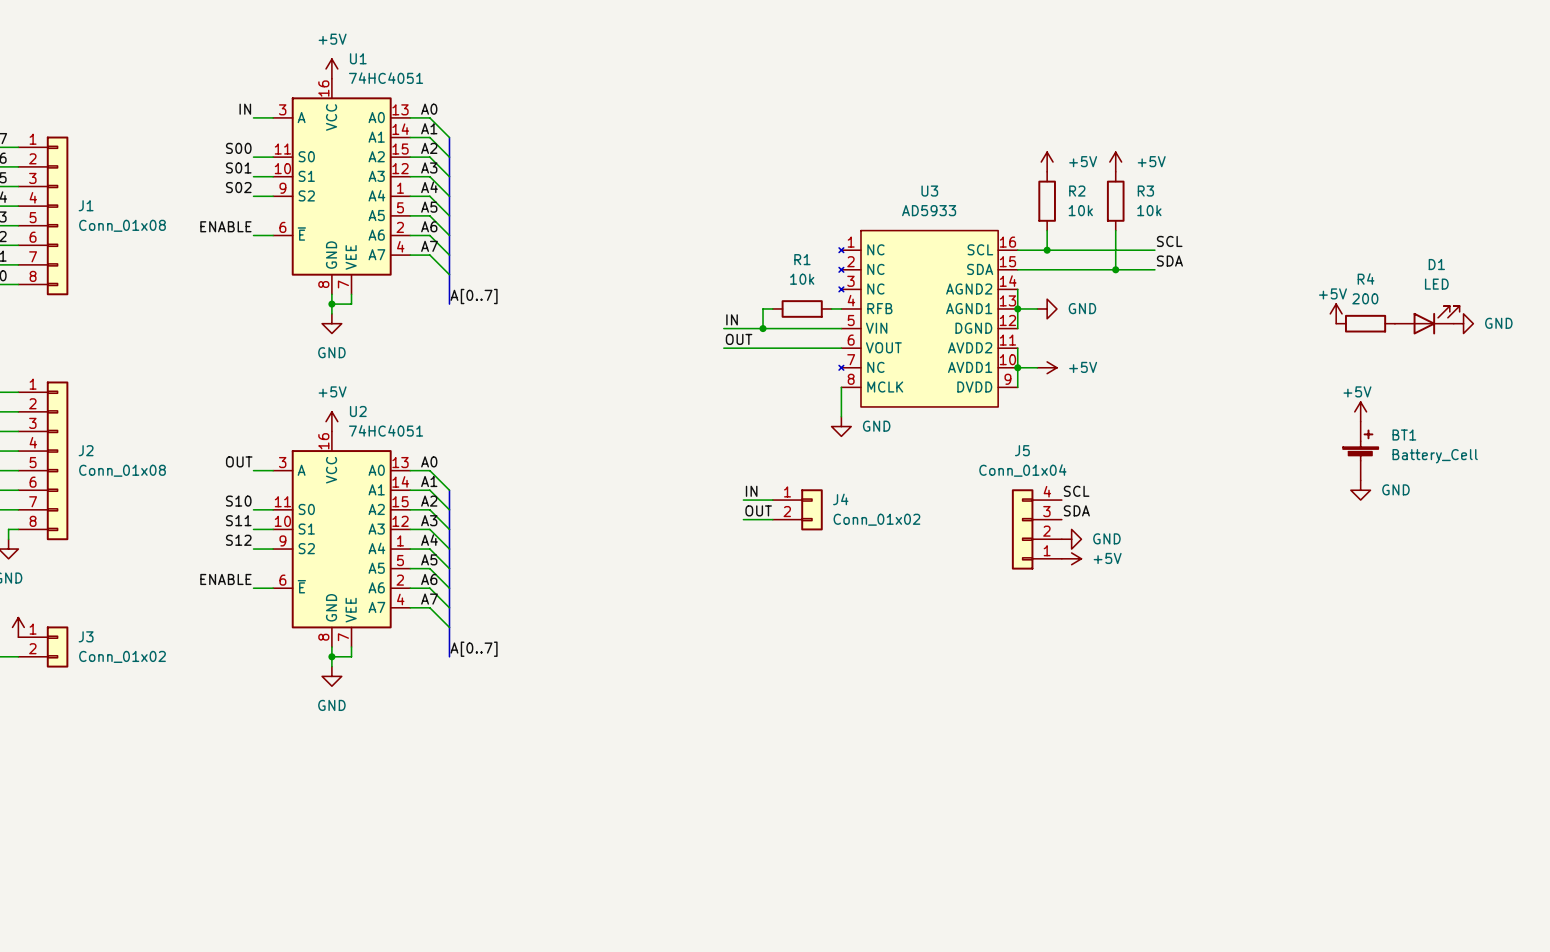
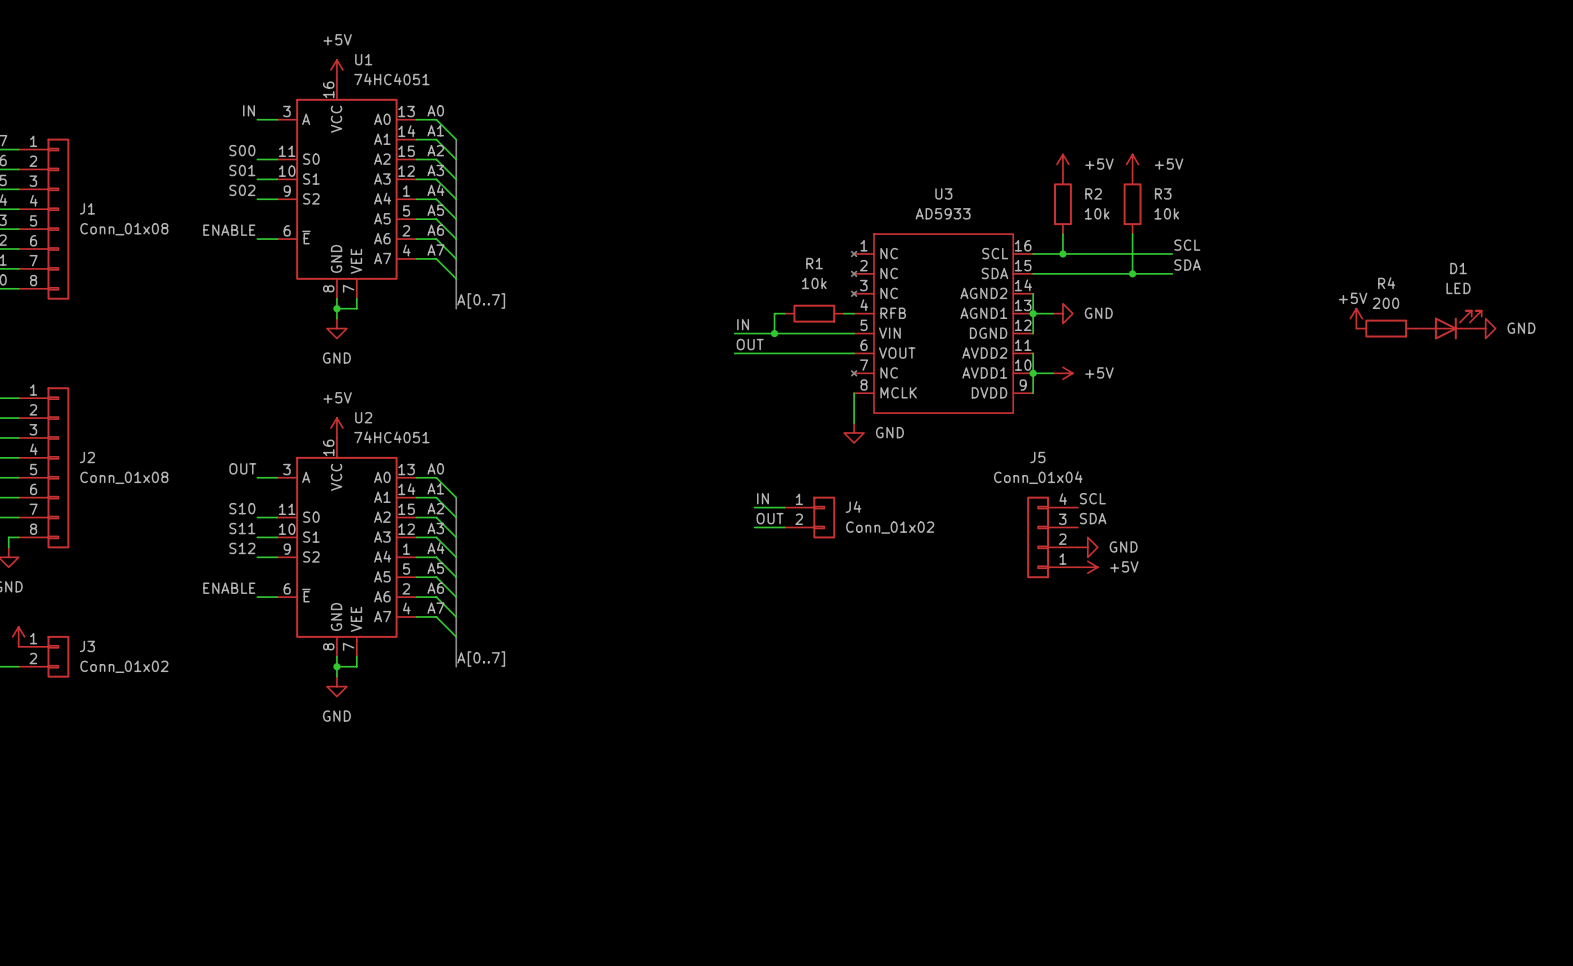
power symbol: +5V (1360, 411) -> none
BT1: Battery_Cell (1360, 451) -> none
power symbol: GND (1360, 490) -> none

